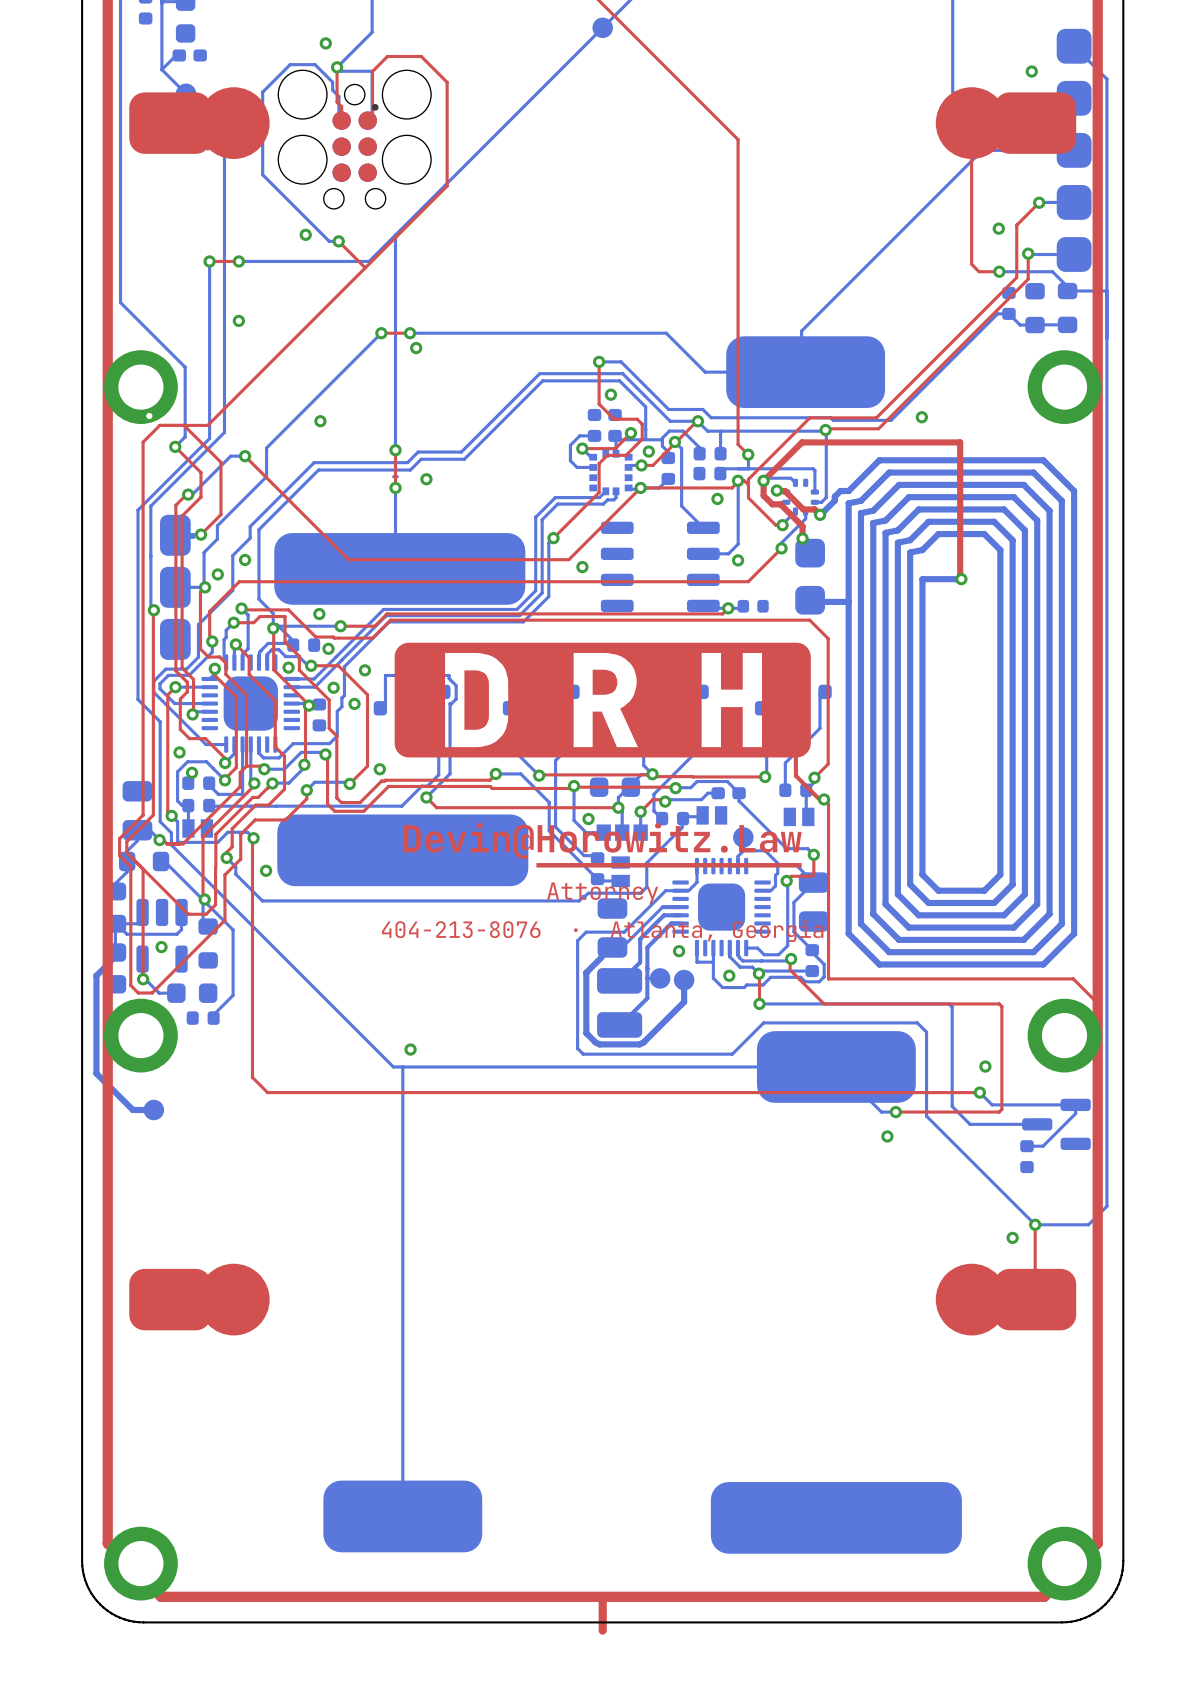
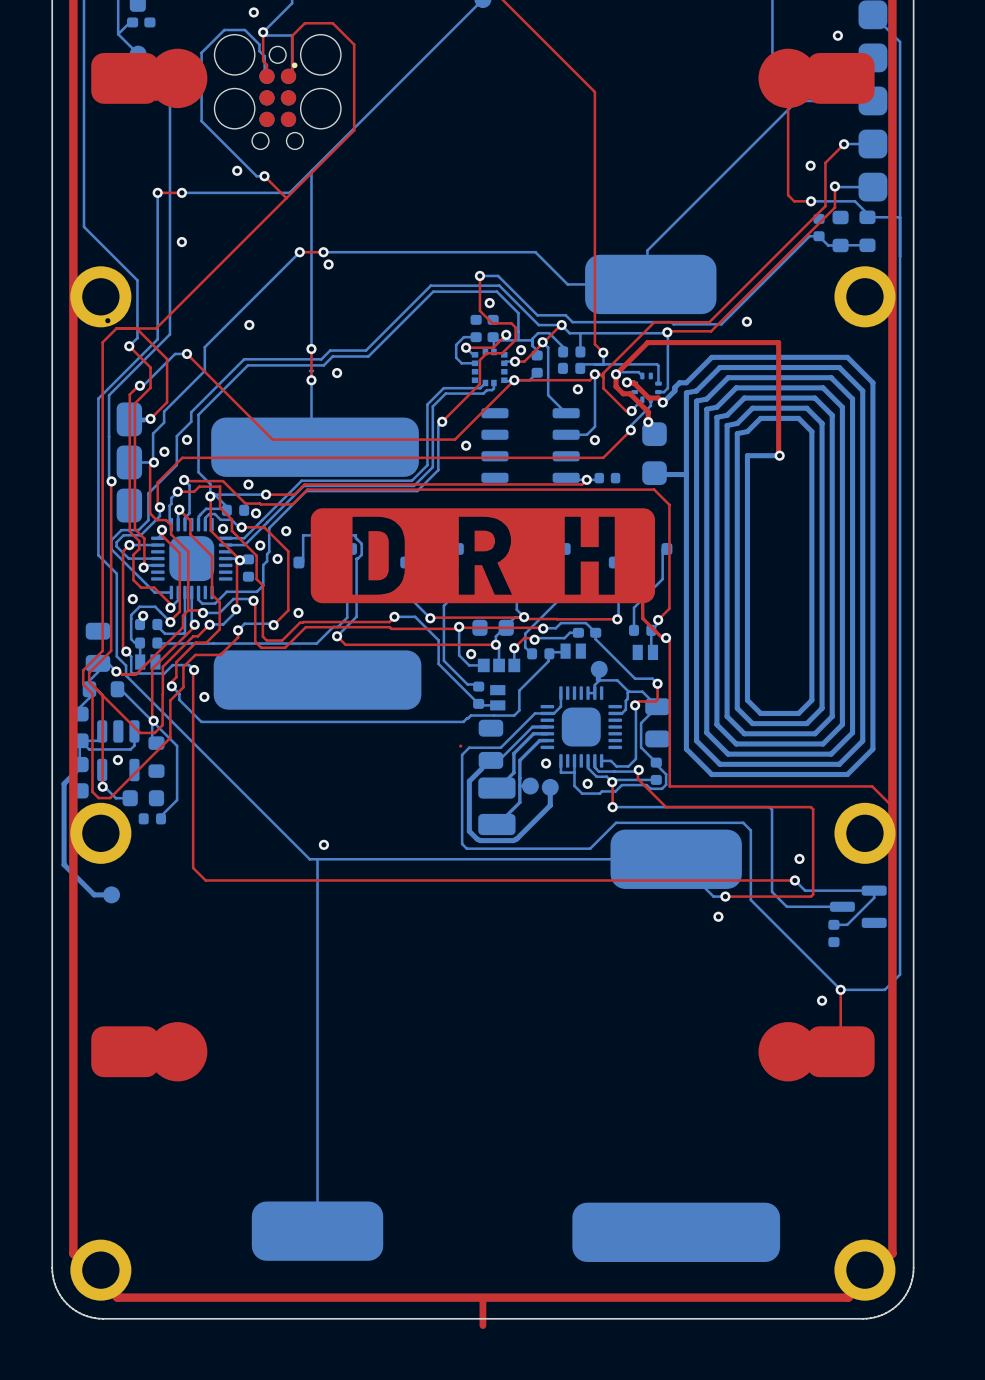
drawing: [382, 823, 824, 942] -> none

